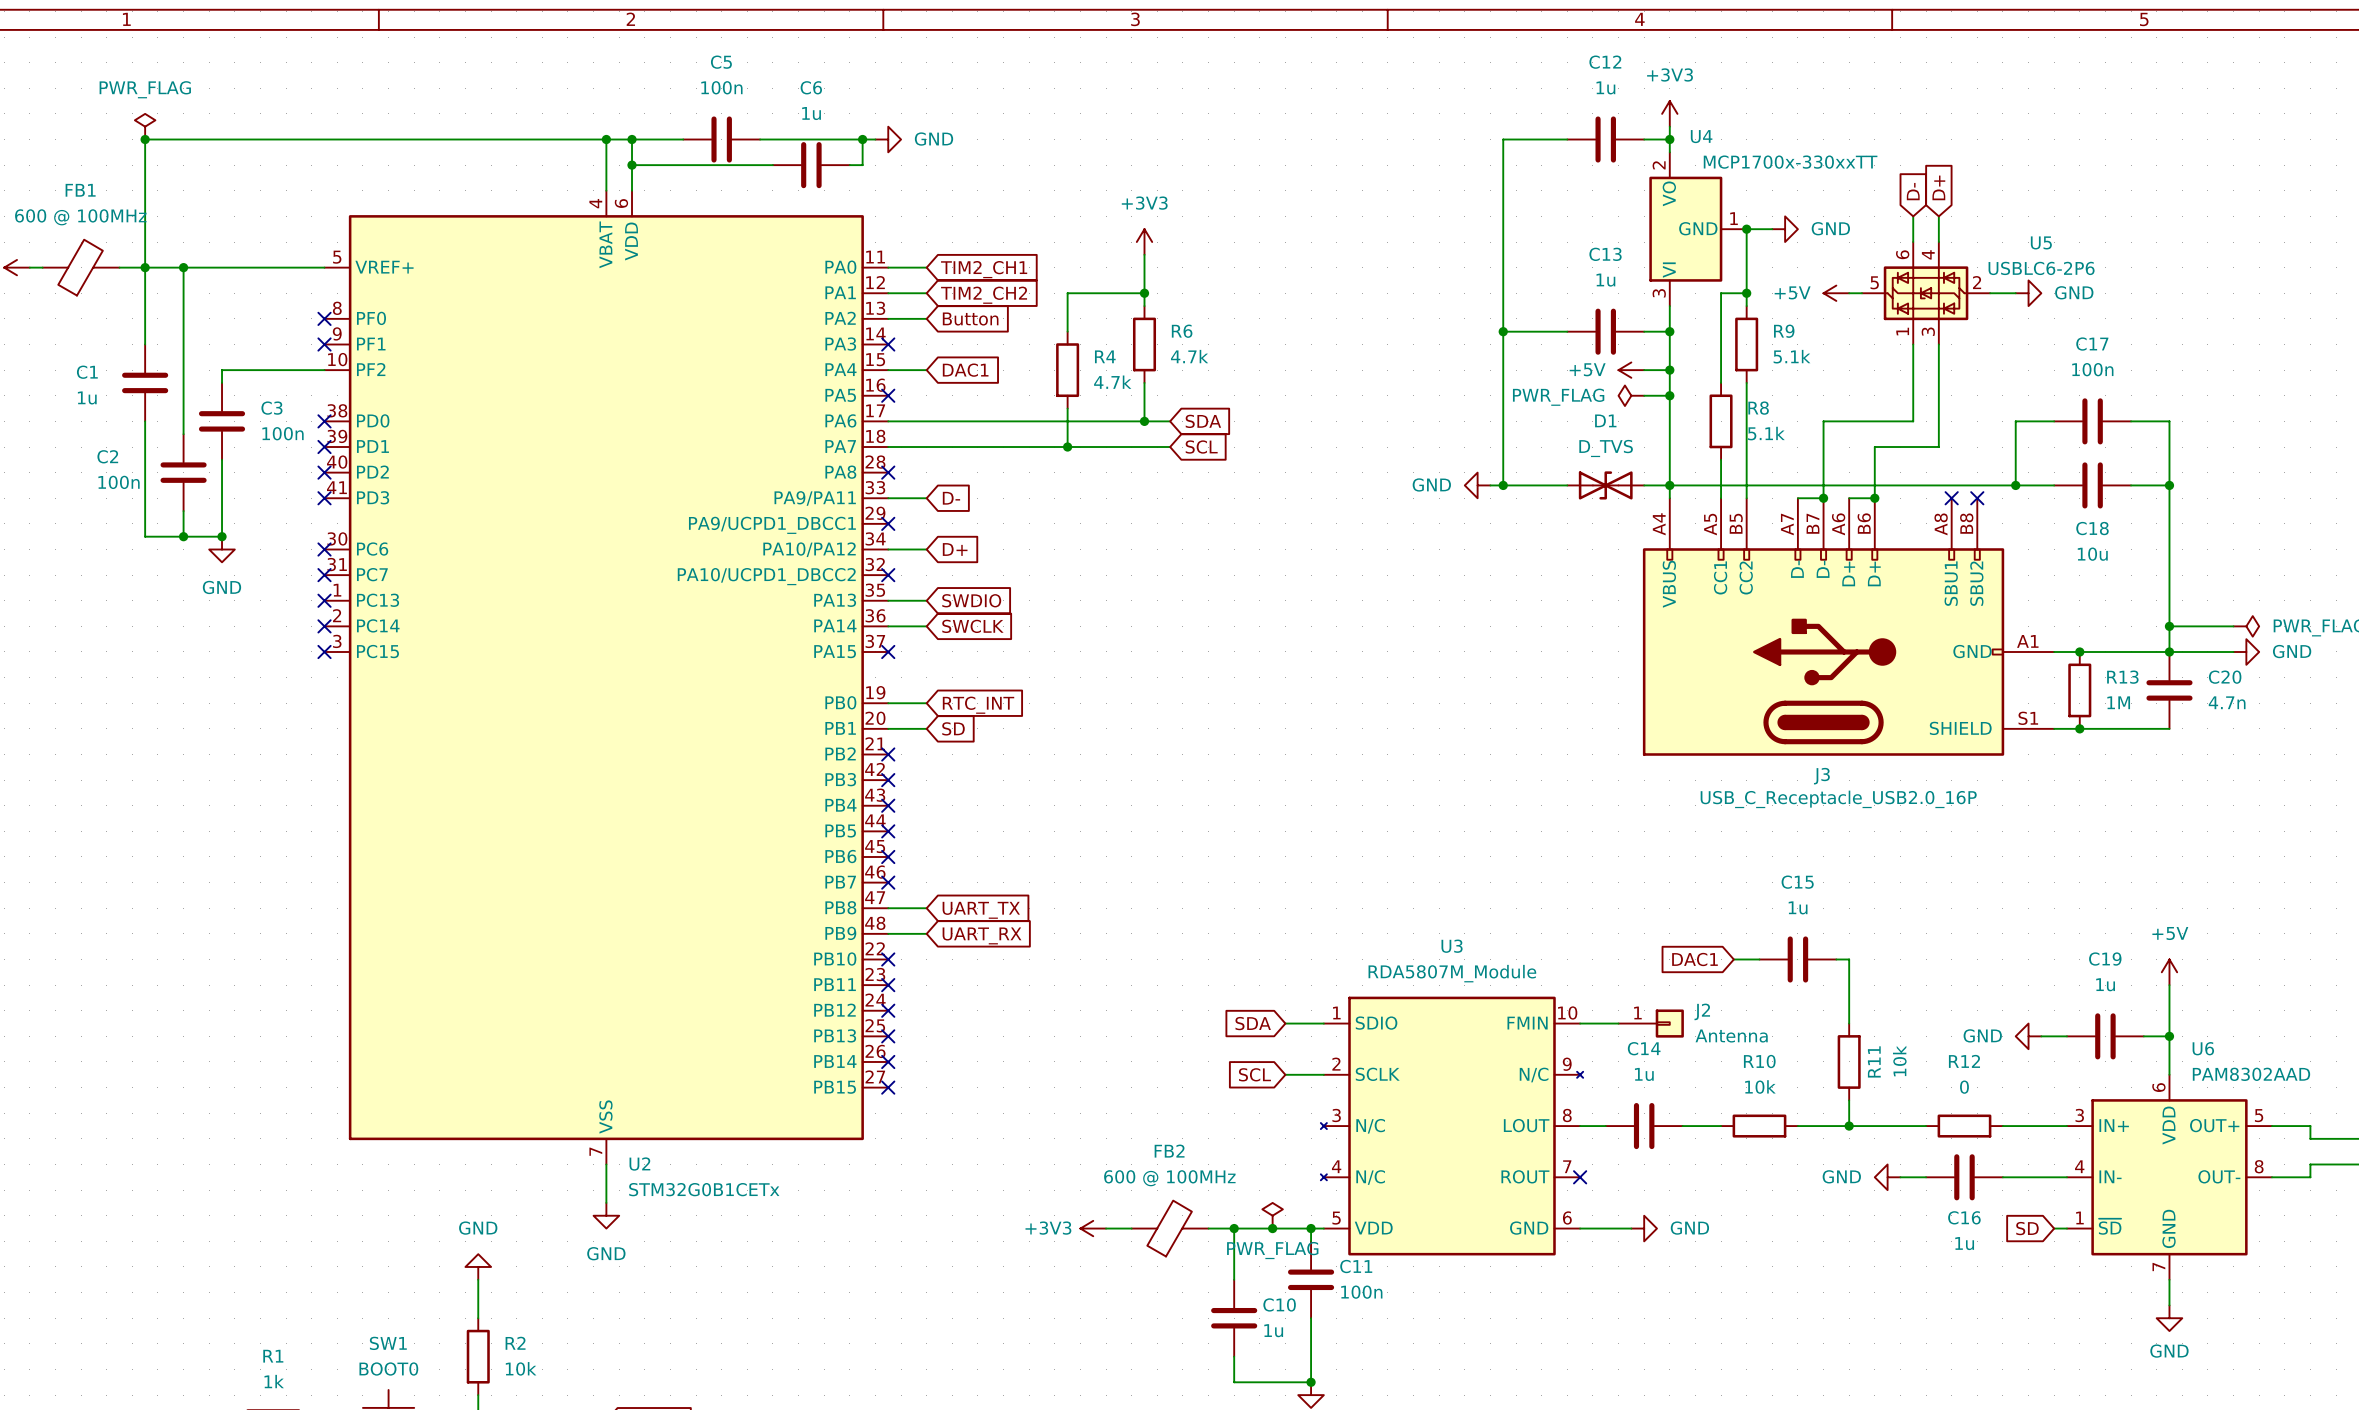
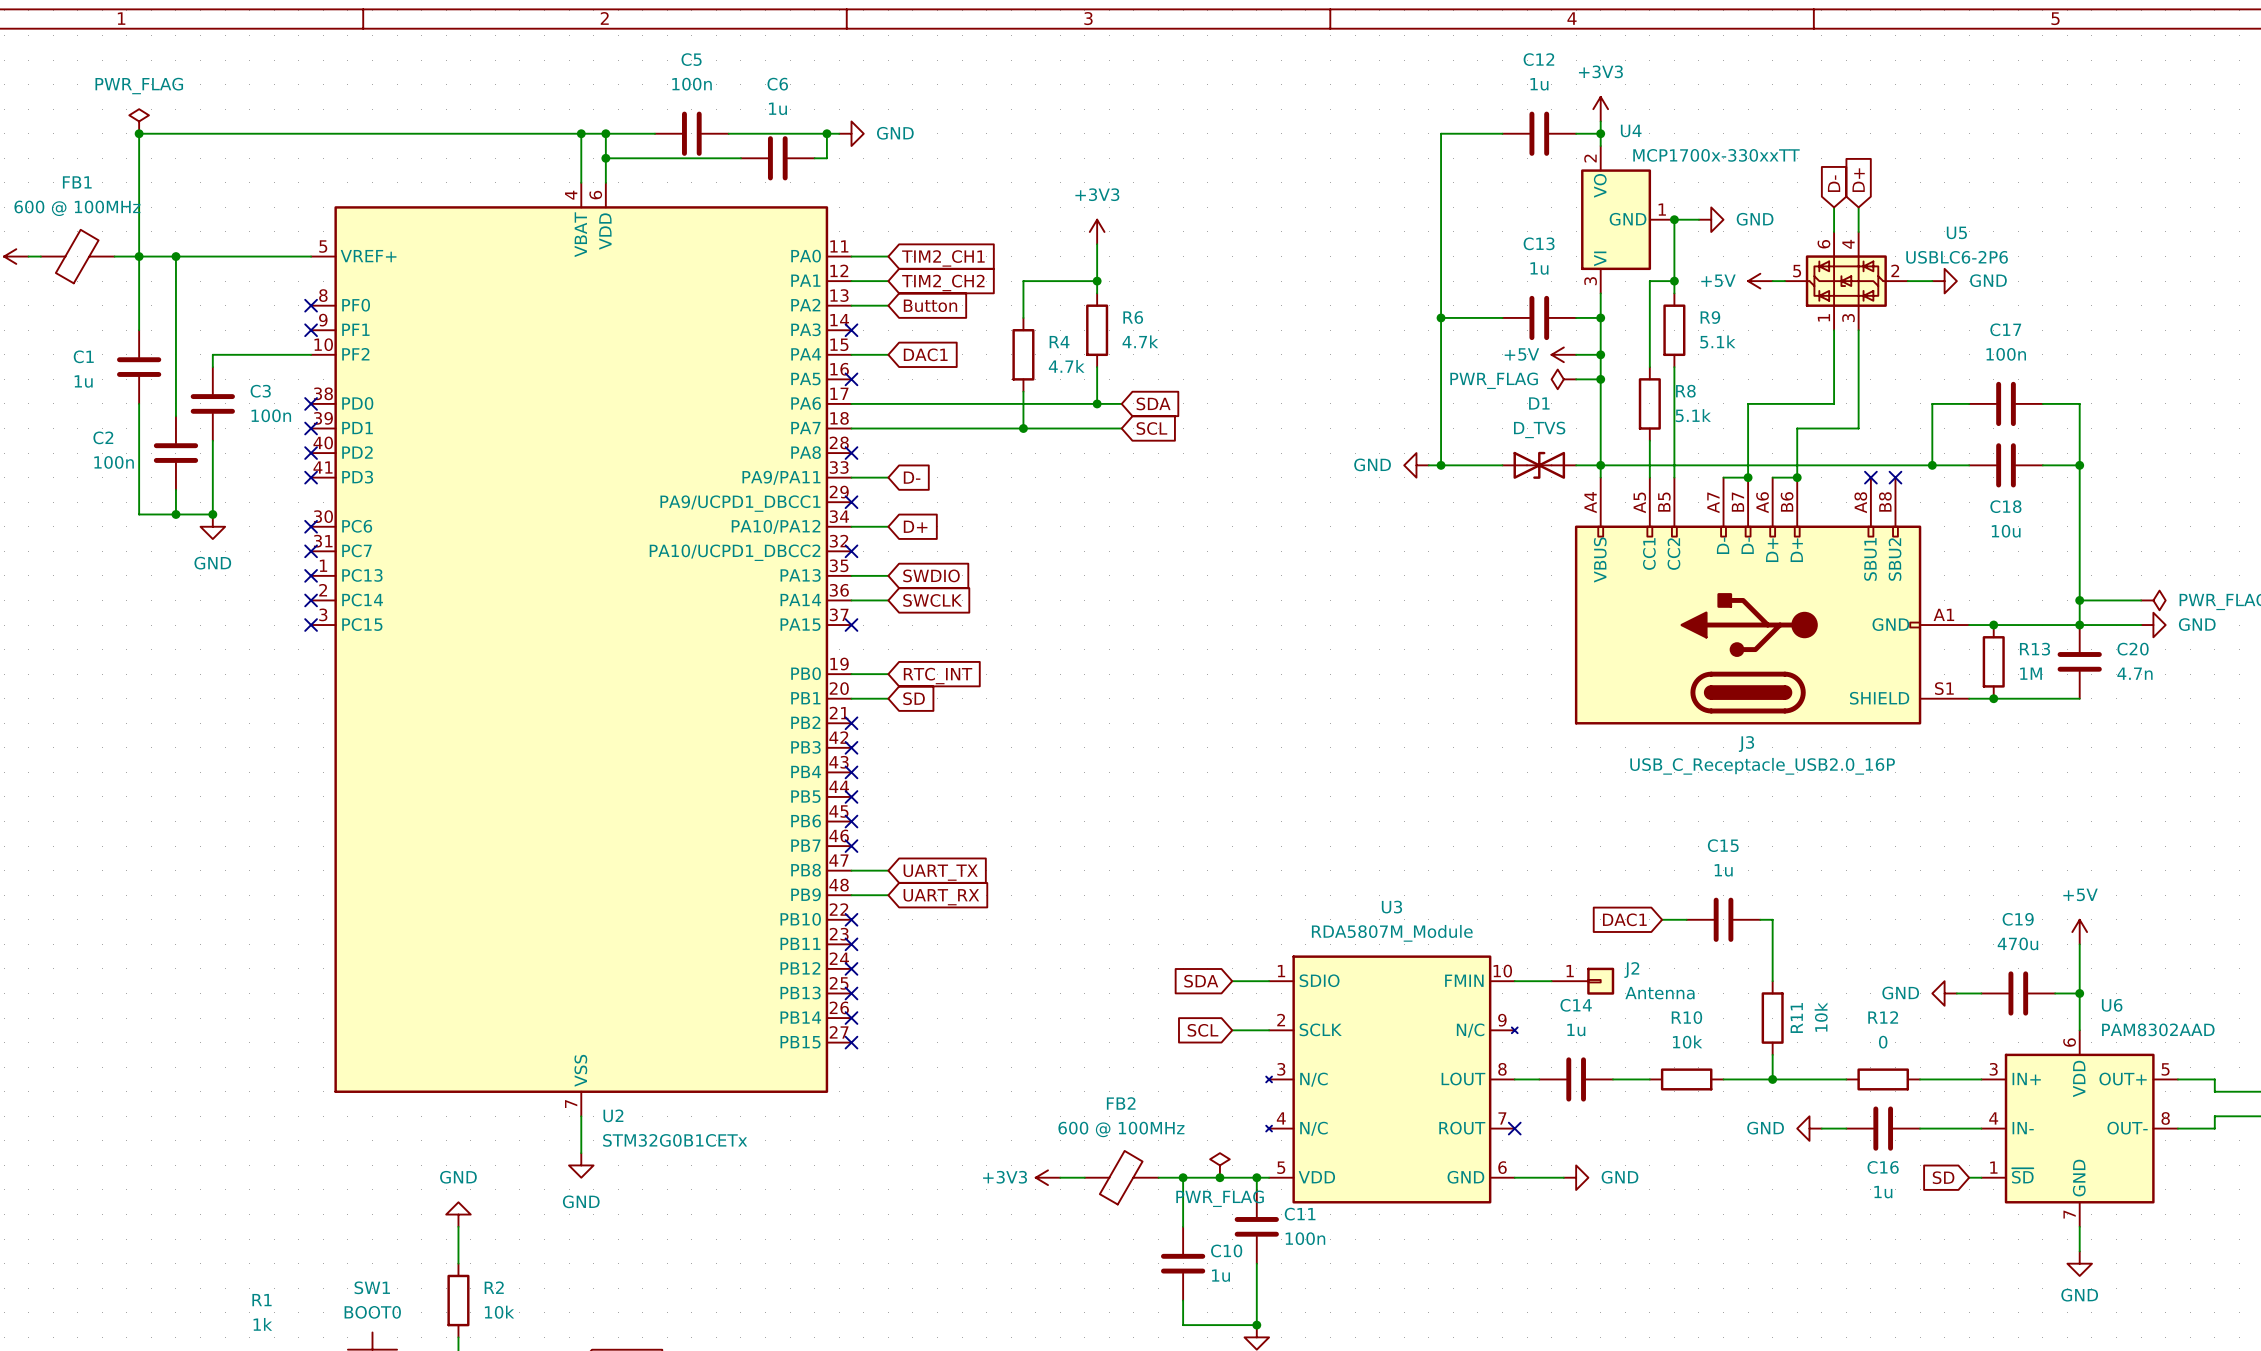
C19 value: 1u (2105, 984) -> 470u (2017, 943)

